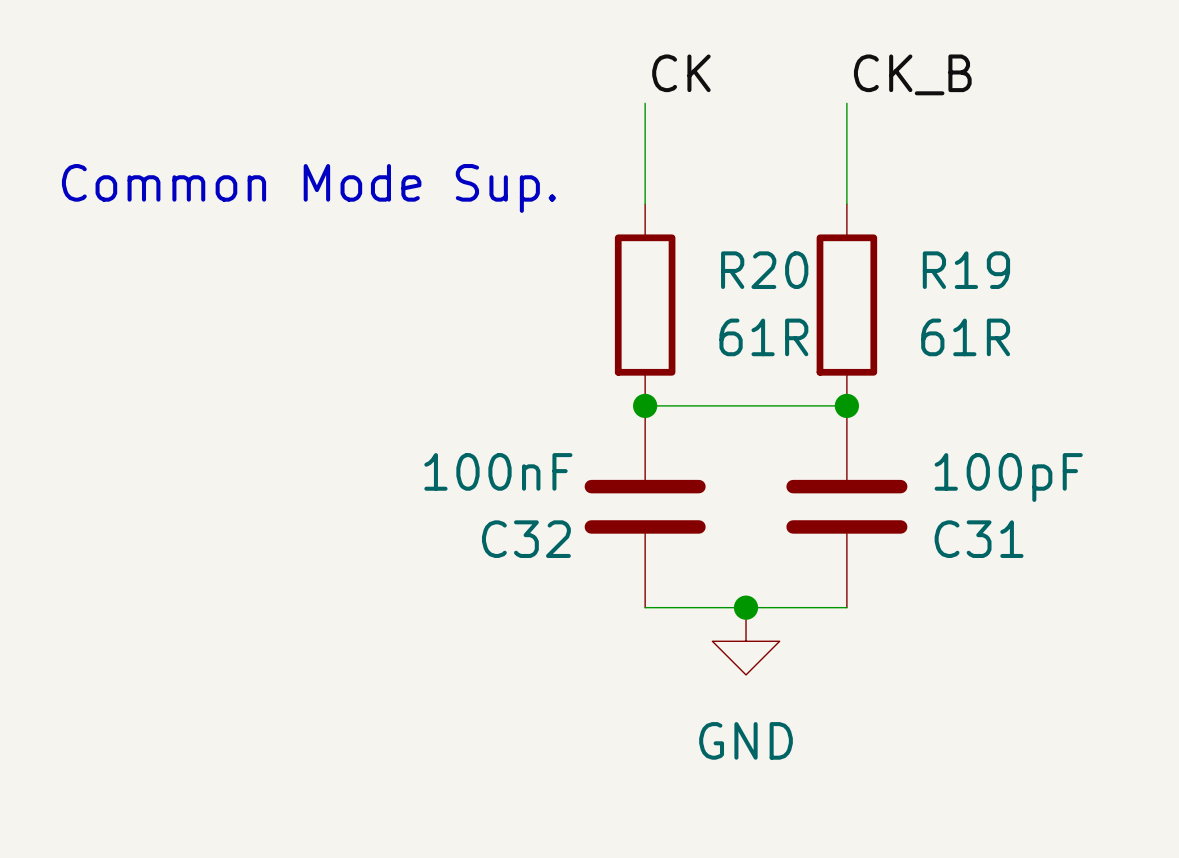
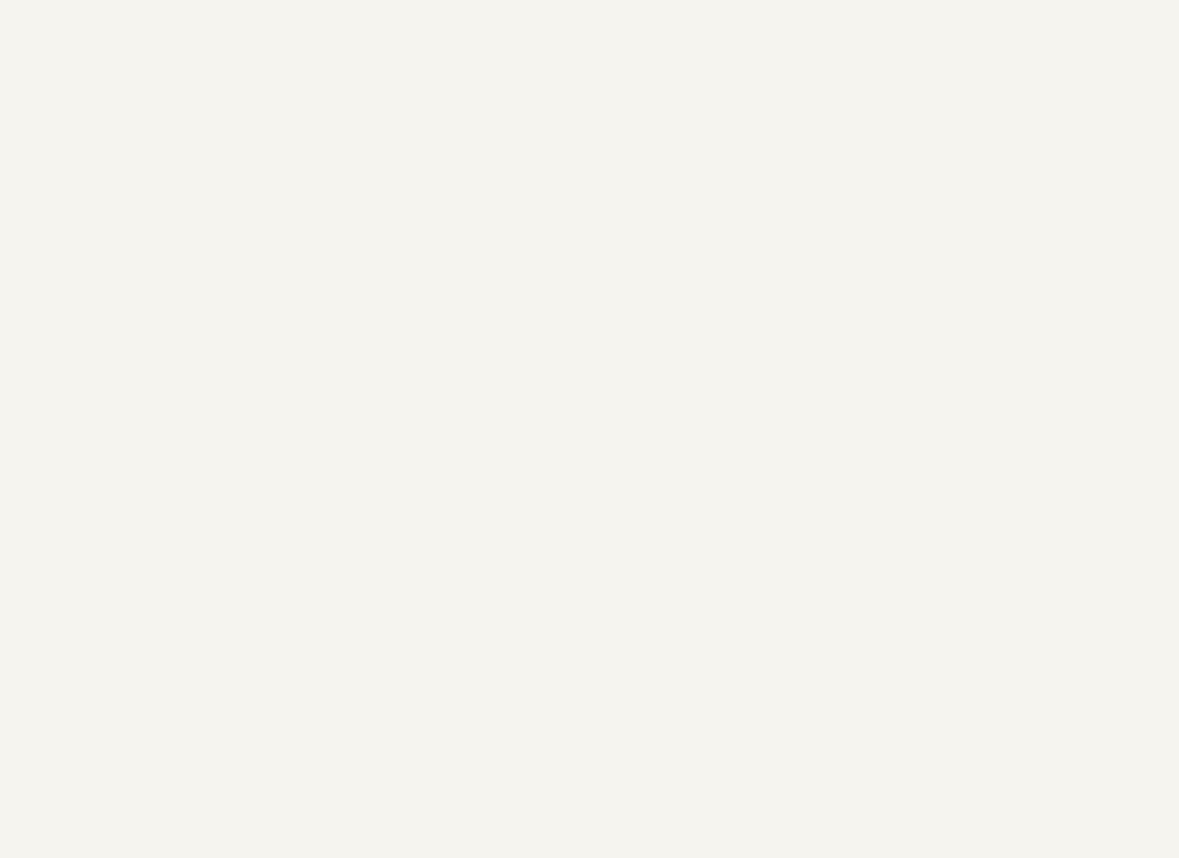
label: CK (681, 73) -> none
label: CK_B (912, 74) -> none
wire: (645, 103) (645, 204) -> none
wire: (846, 103) (846, 204) -> none
text: Common Mode Sup. (308, 188) -> none
R20: 61R (645, 305) -> none
R19: 61R (846, 305) -> none
wire: (645, 405) (846, 405) -> none
junction: (645, 405) -> none
junction: (846, 405) -> none
C32: 100nF (645, 506) -> none
C31: 100pF (846, 506) -> none
wire: (645, 607) (846, 607) -> none
junction: (746, 607) -> none
power symbol: GND (746, 641) -> none

